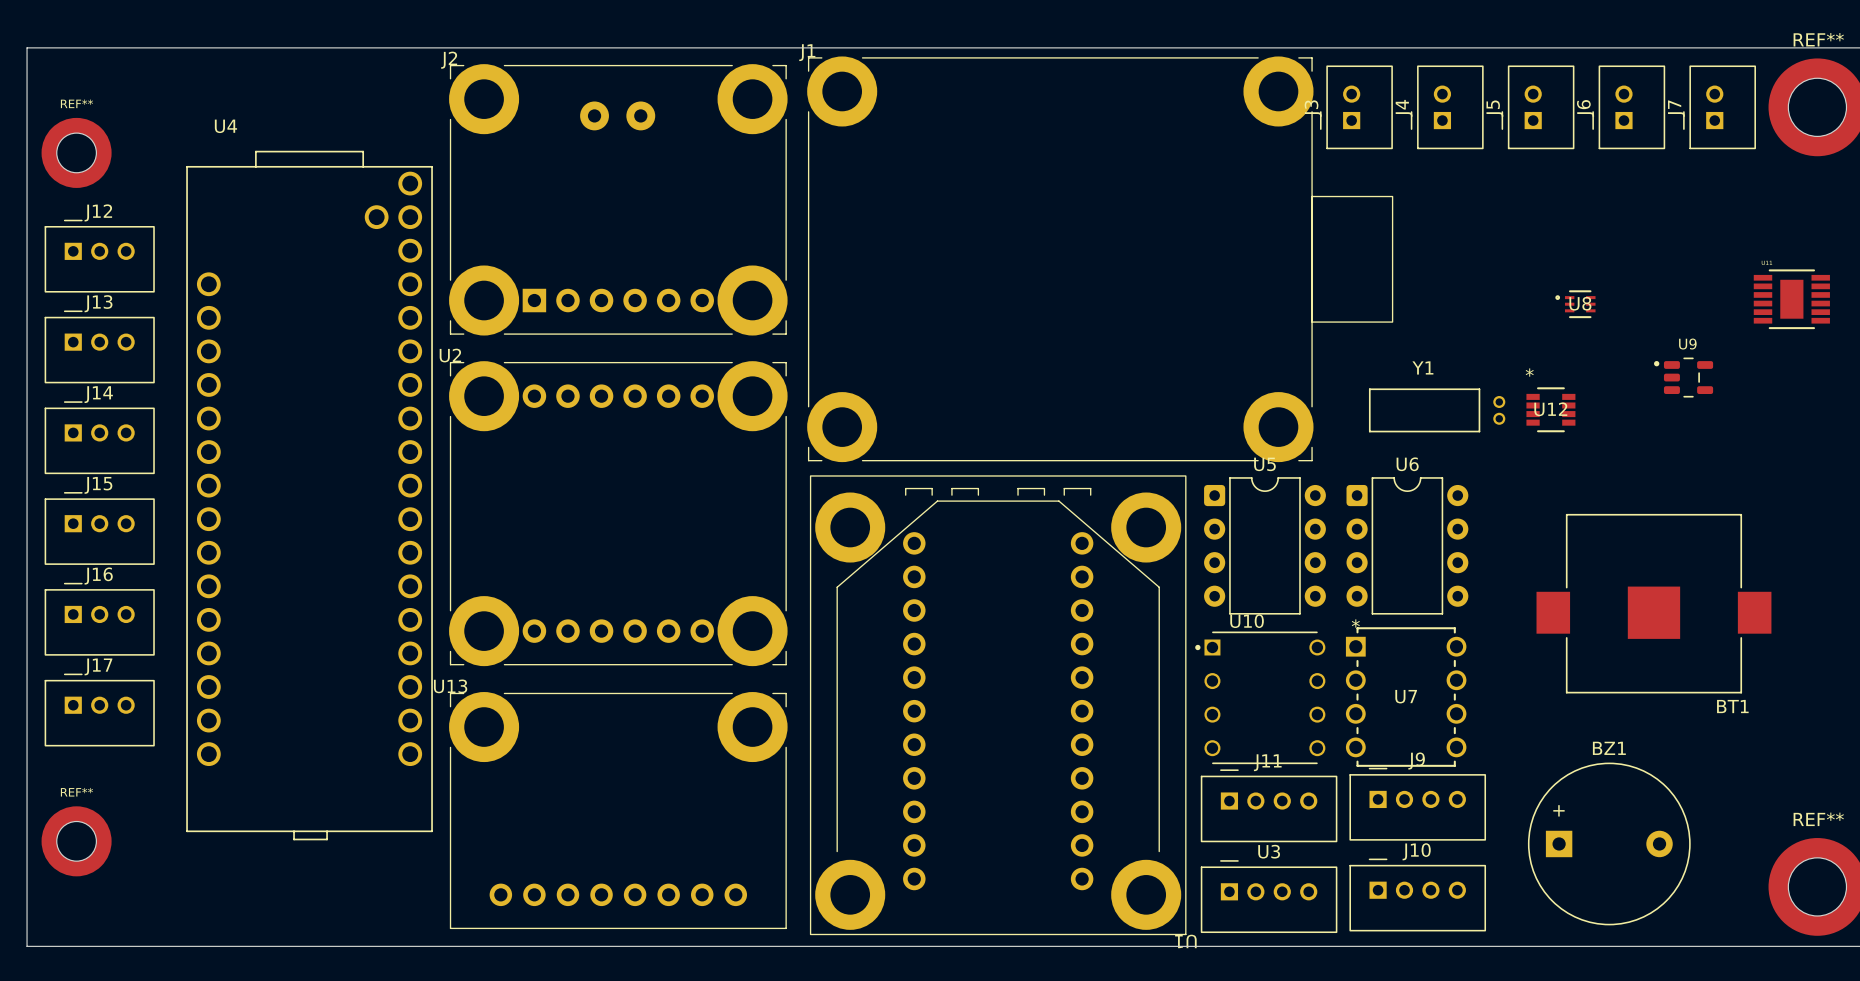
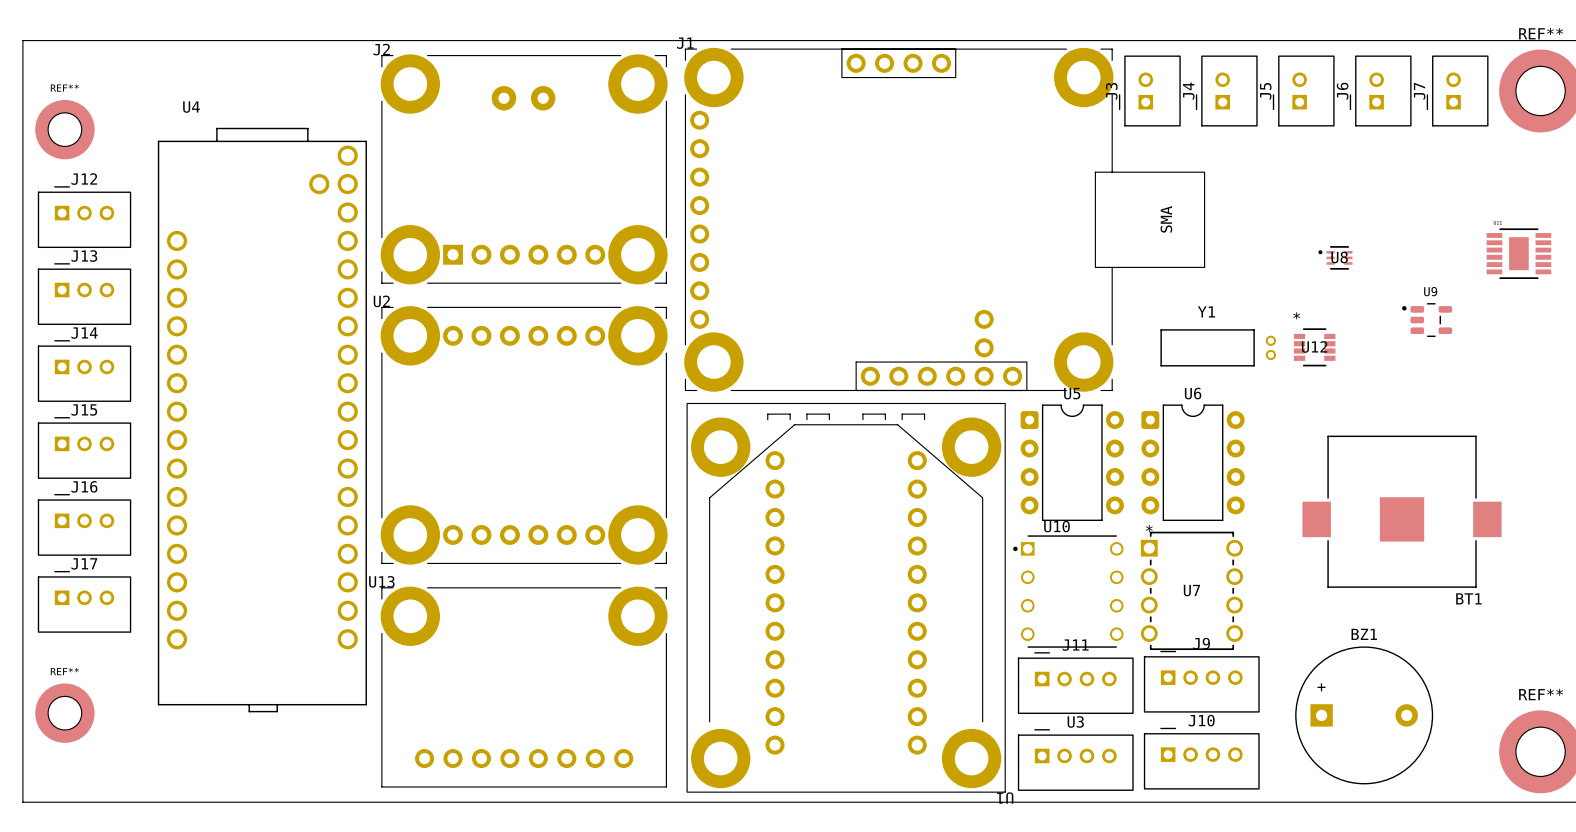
J1 footprint: [807, 56, 1394, 463] -> [684, 47, 1206, 392]

